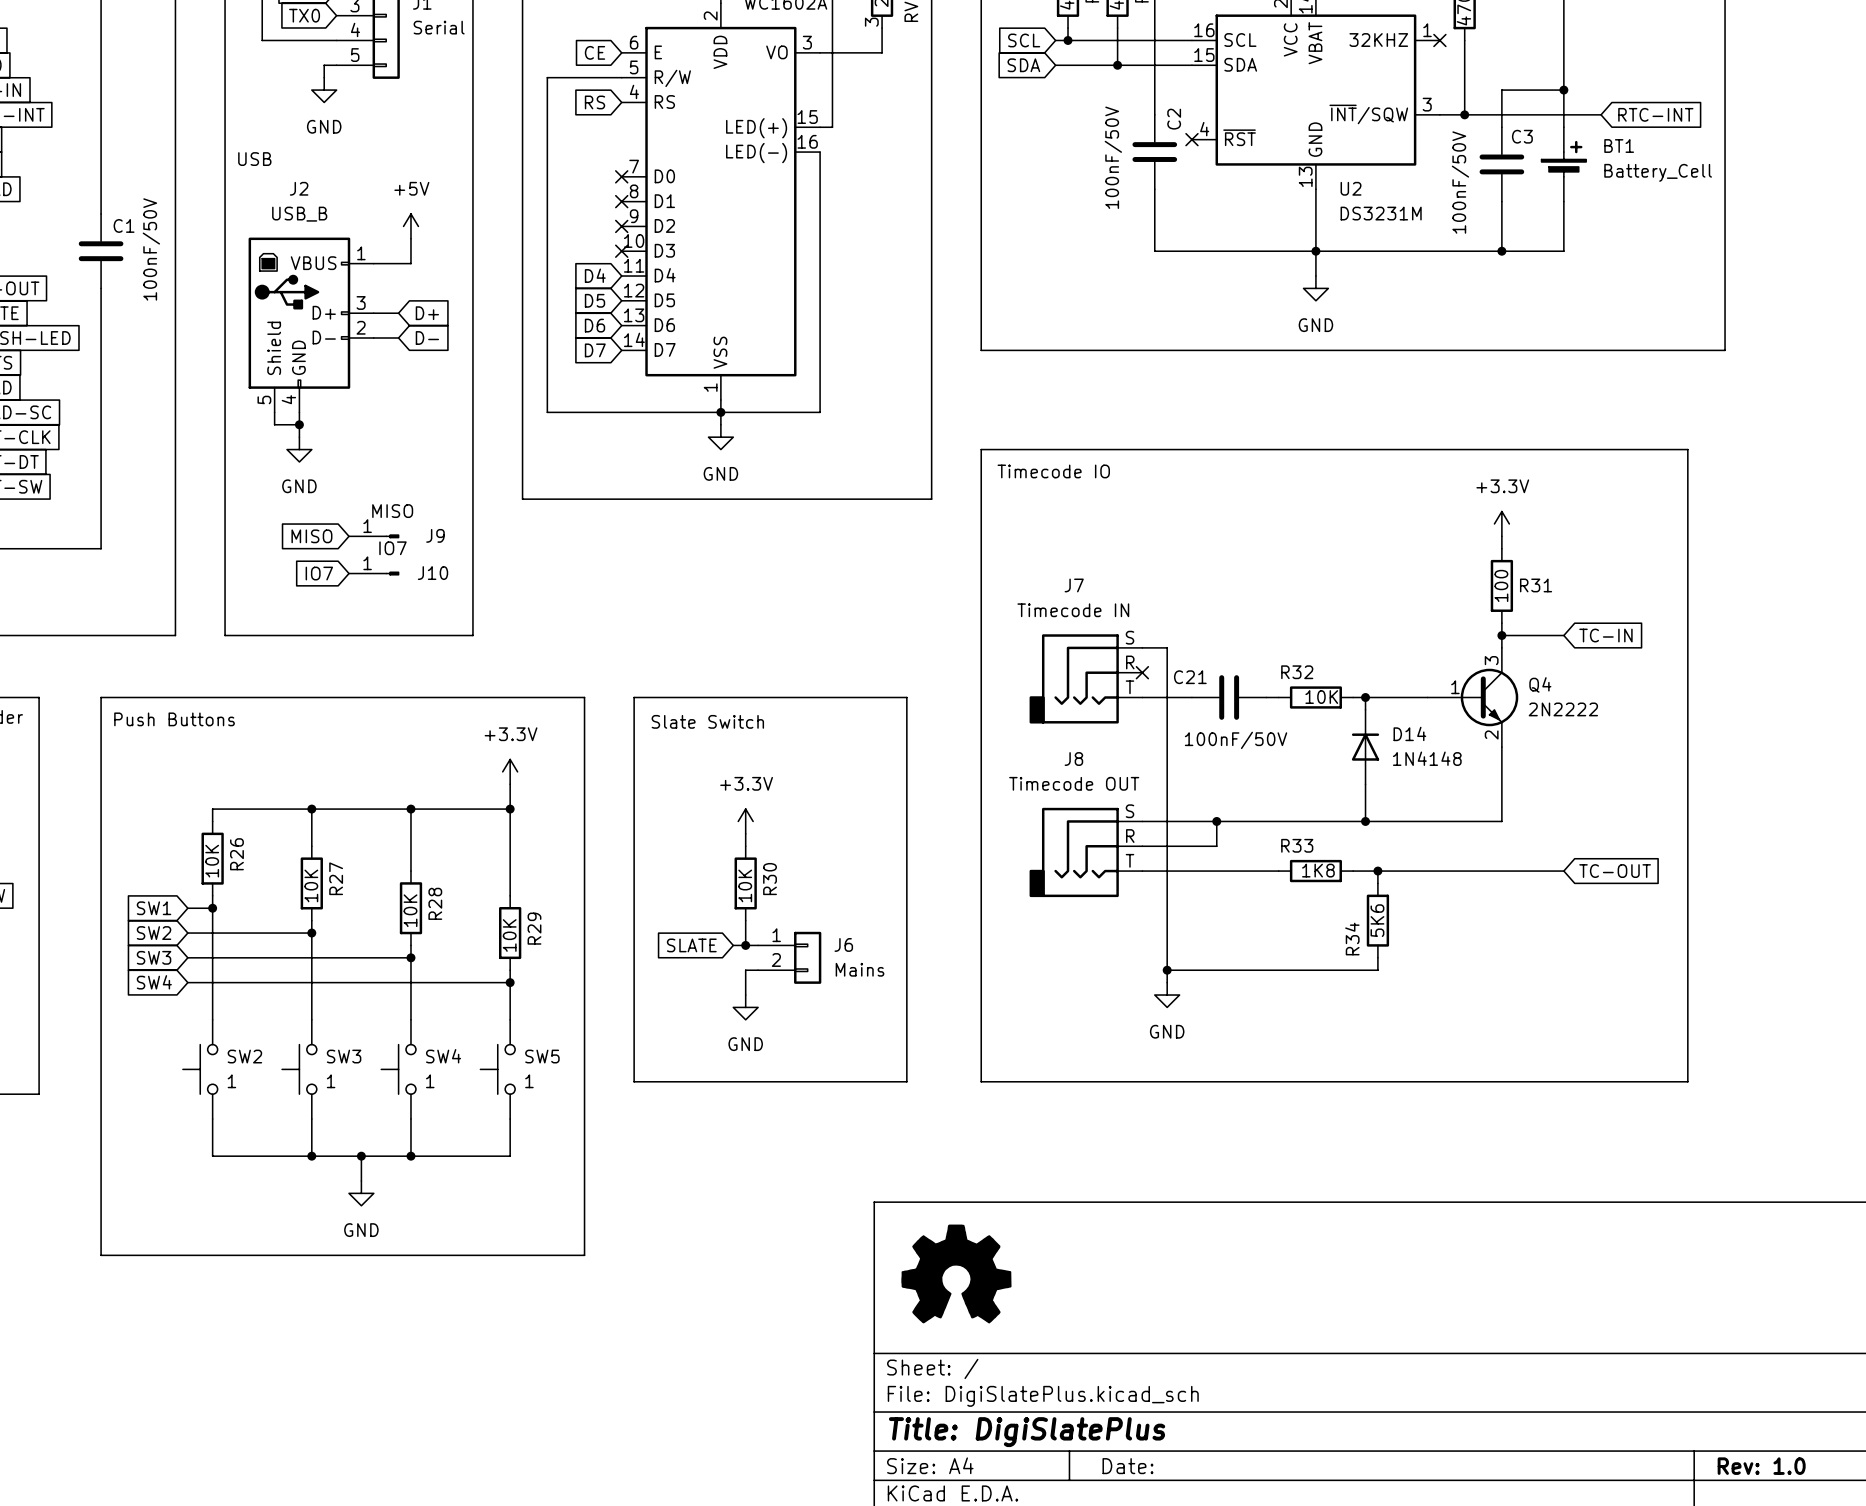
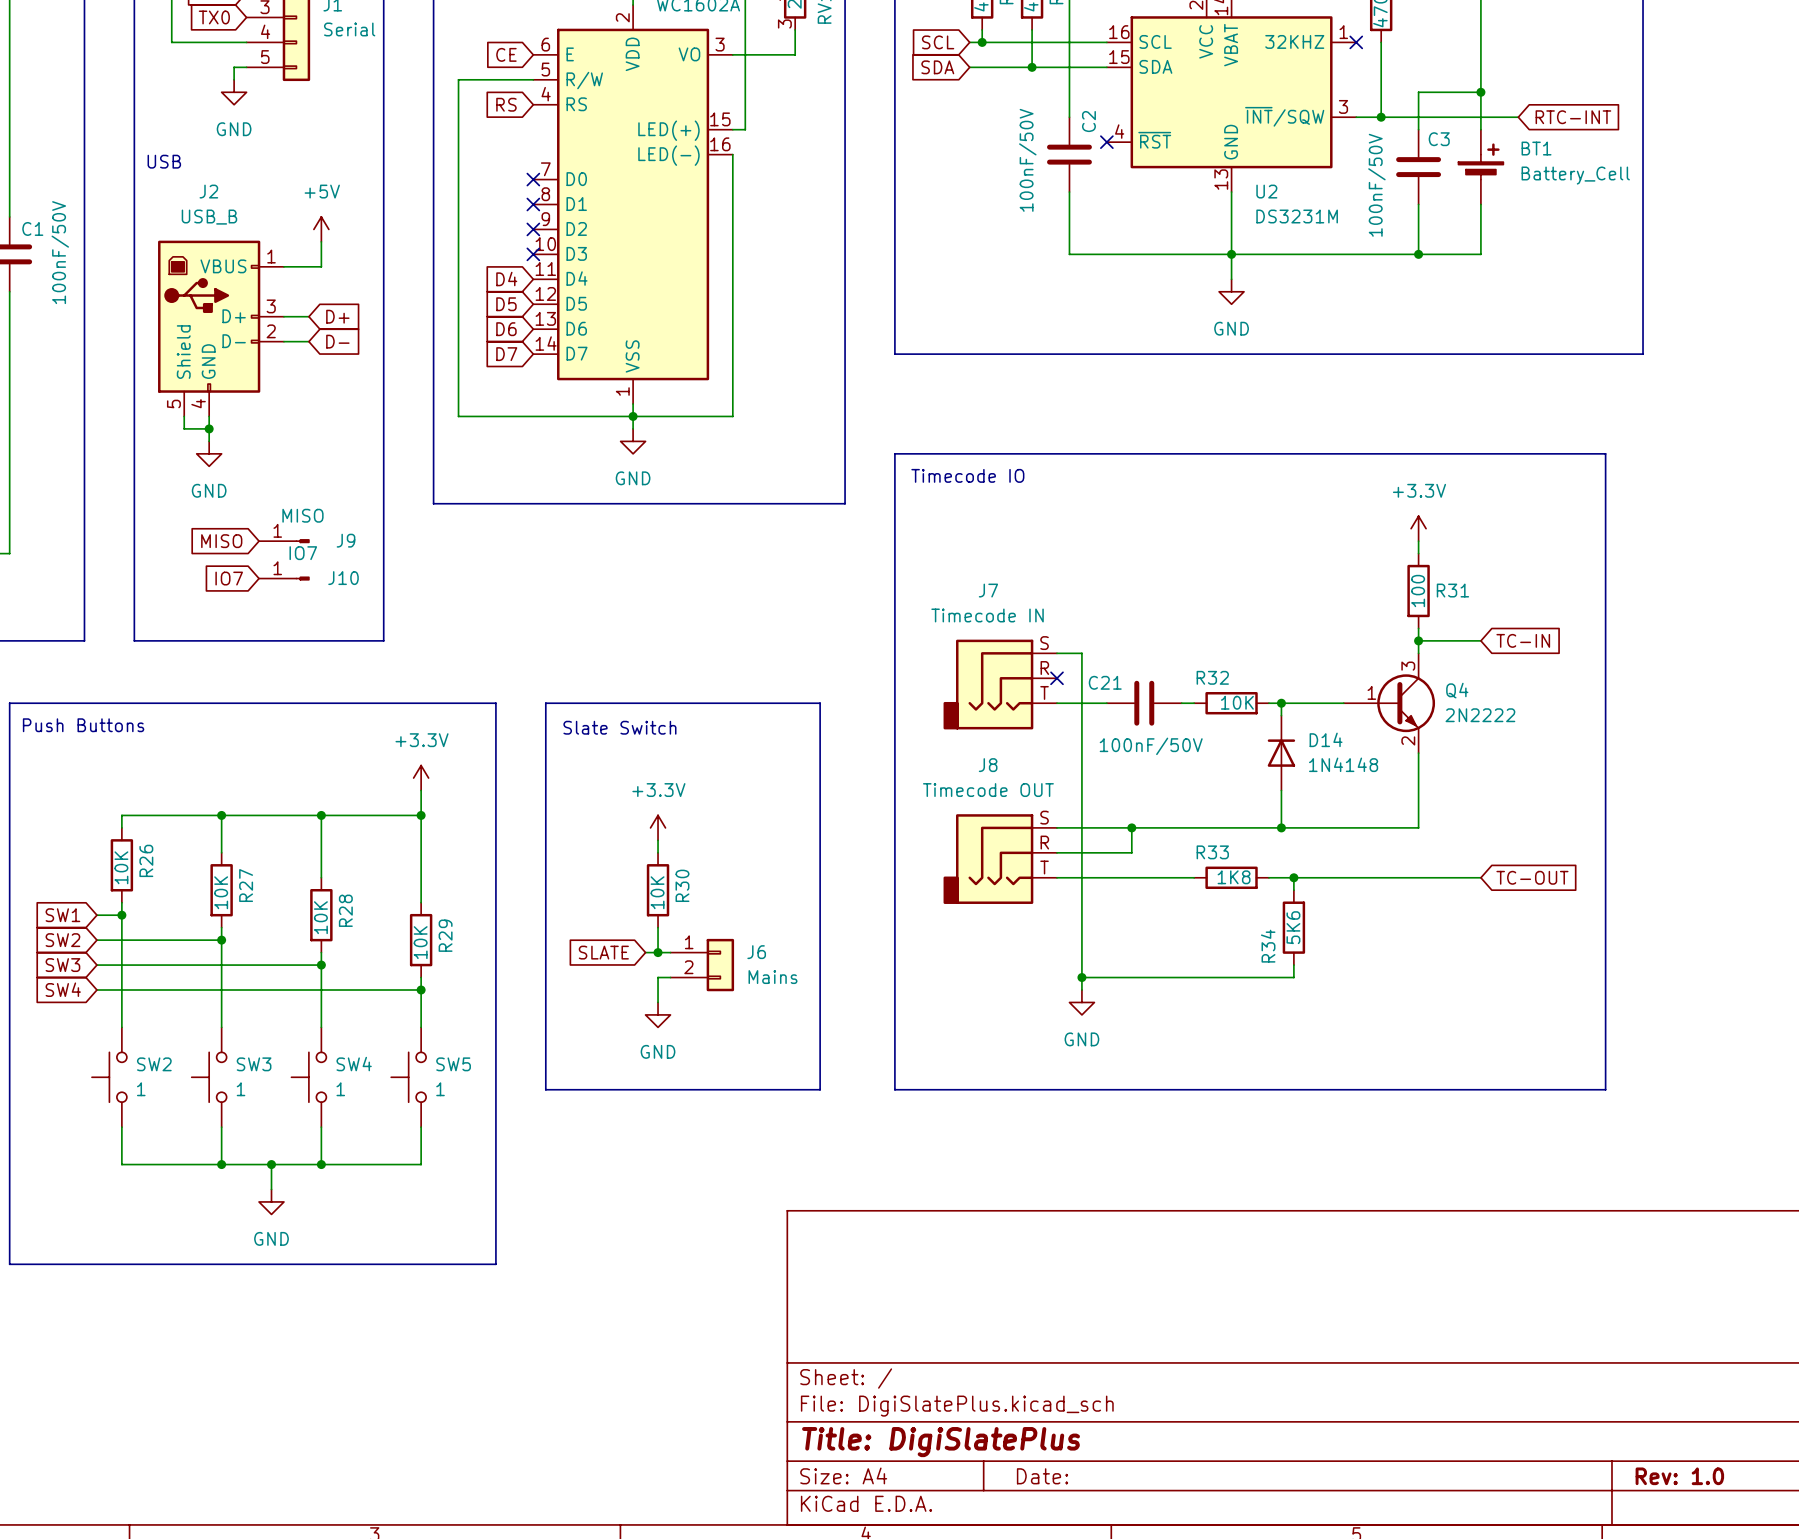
power symbol: (956, 1273) -> none

